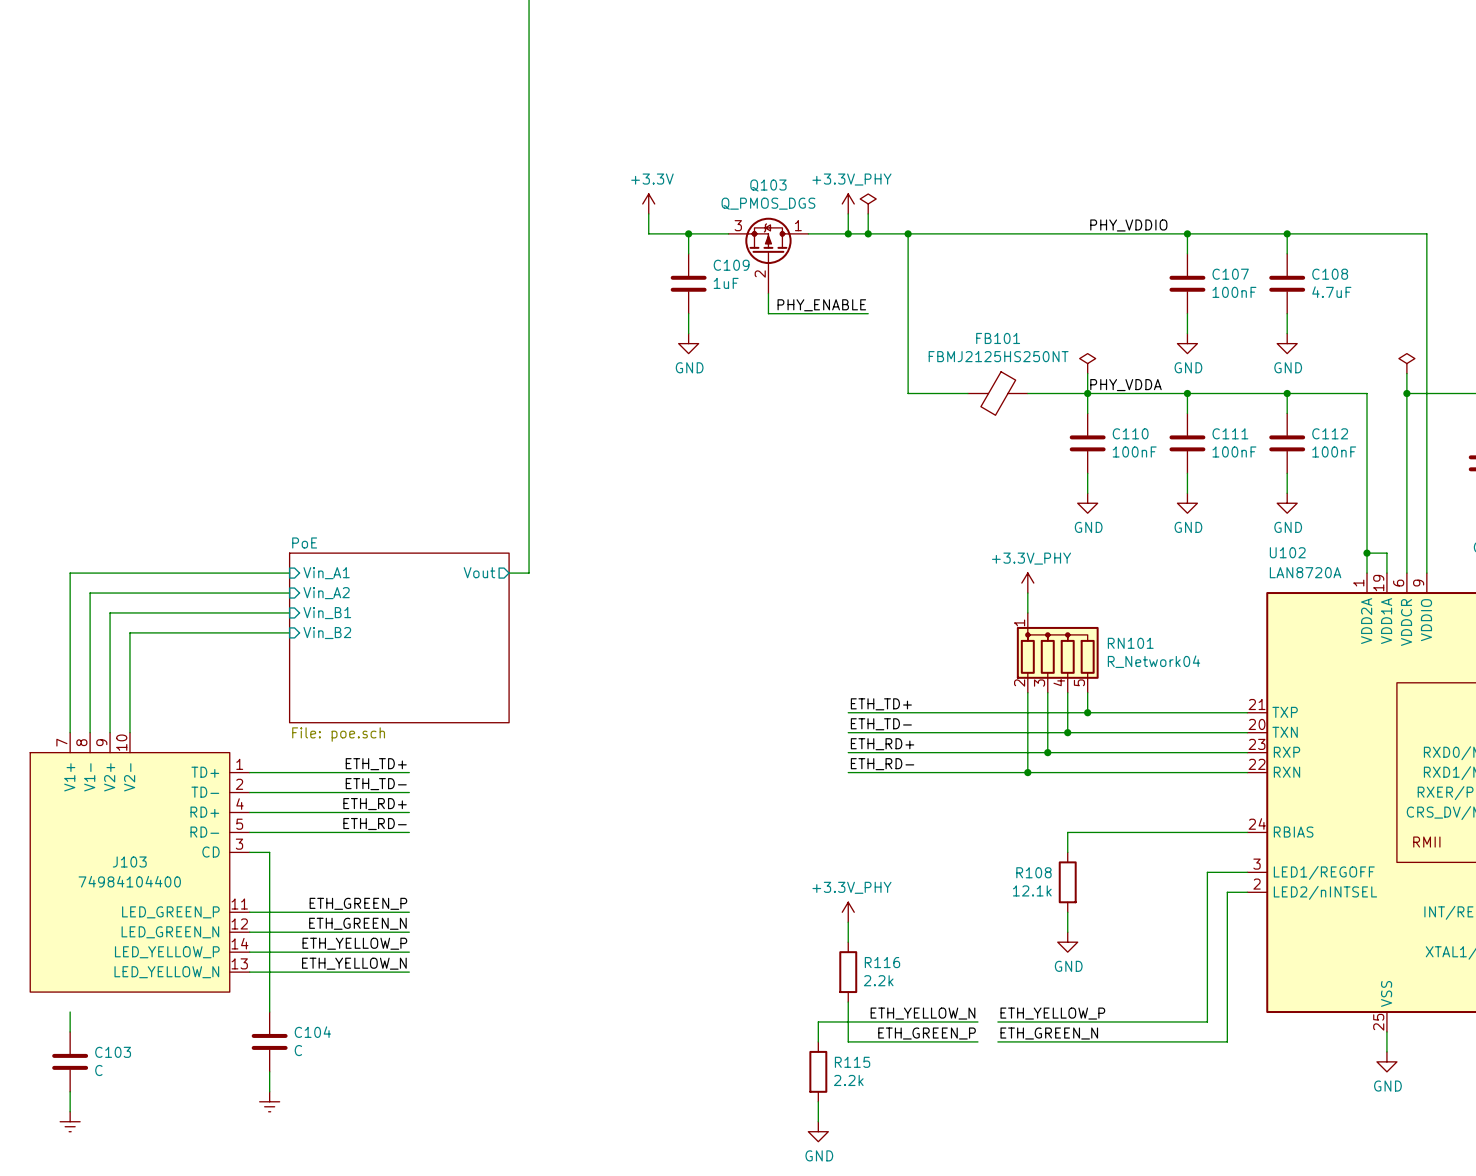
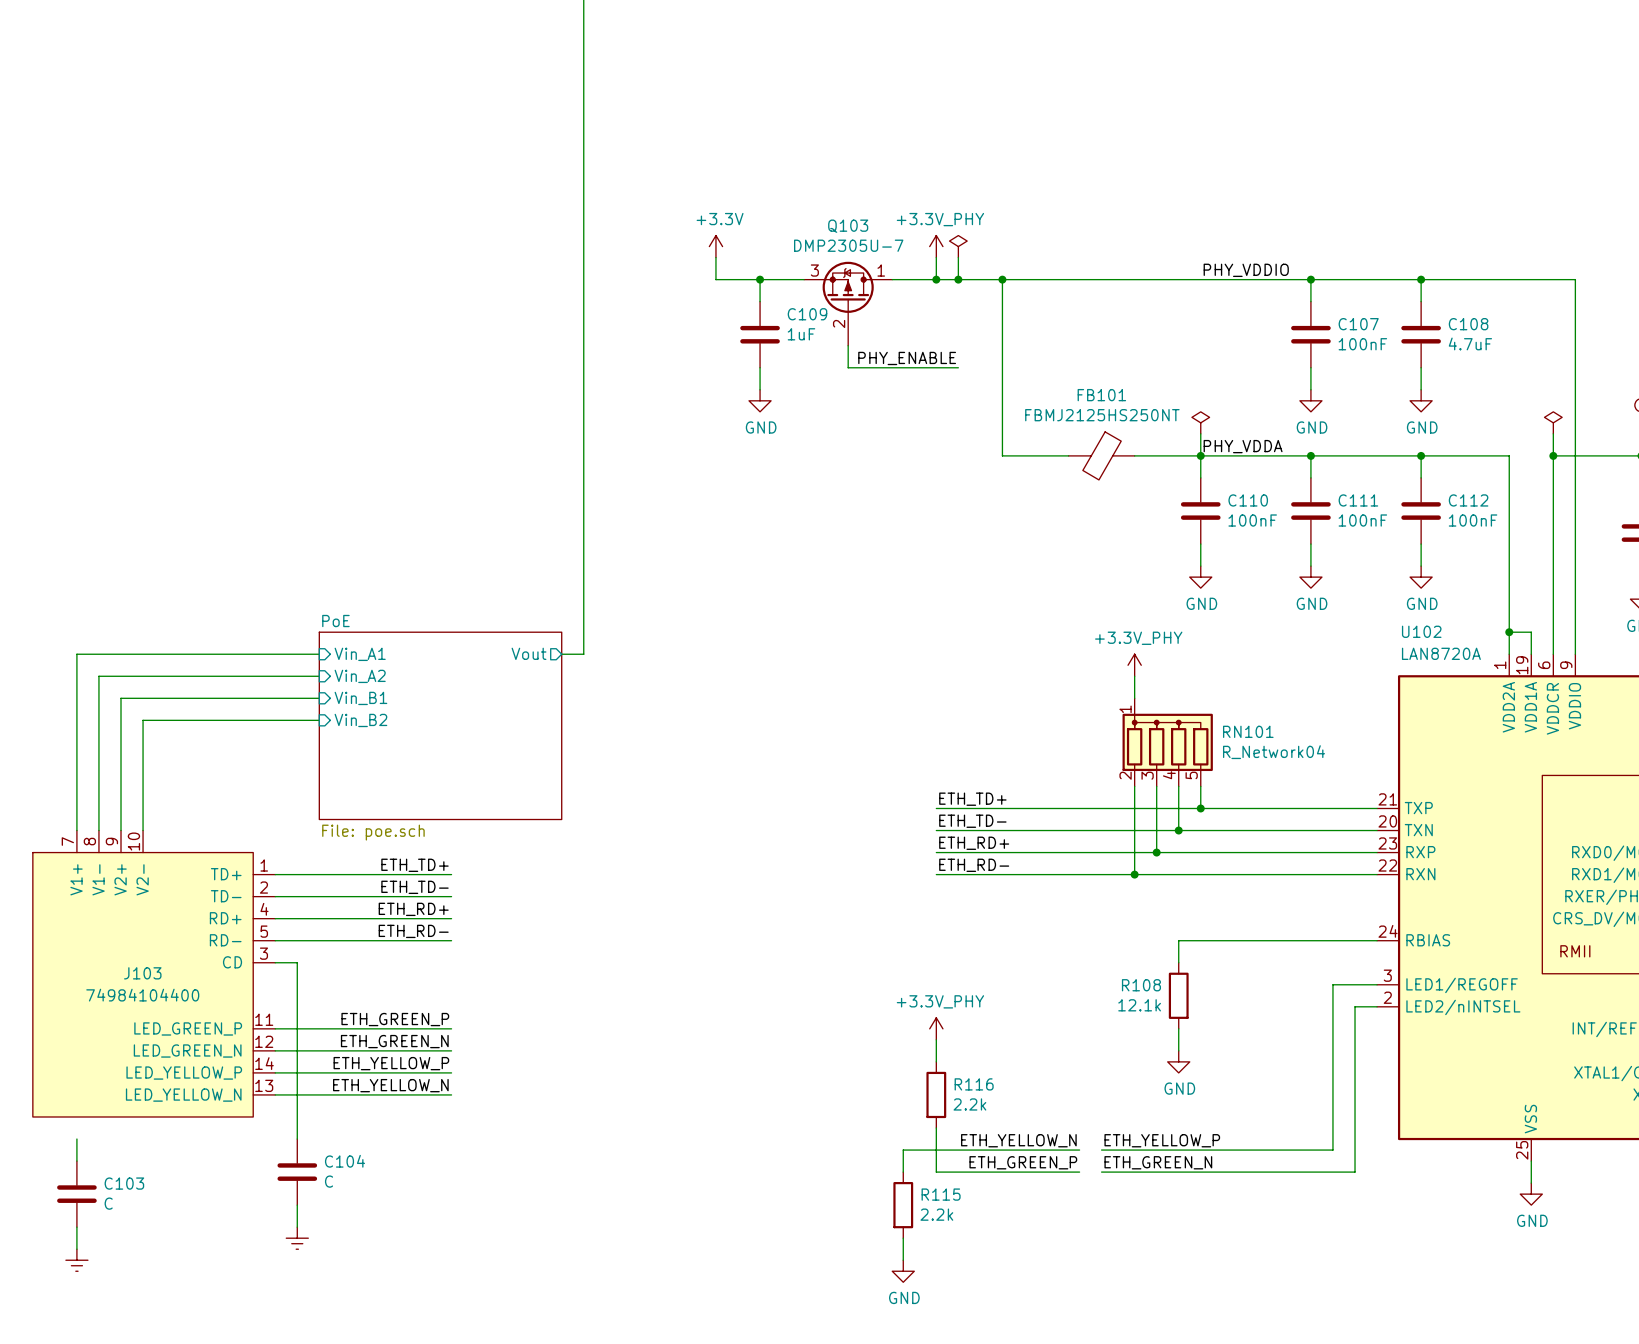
Q103 value: Q_PMOS_DGS (768, 203) -> DMP2305U-7 (848, 245)

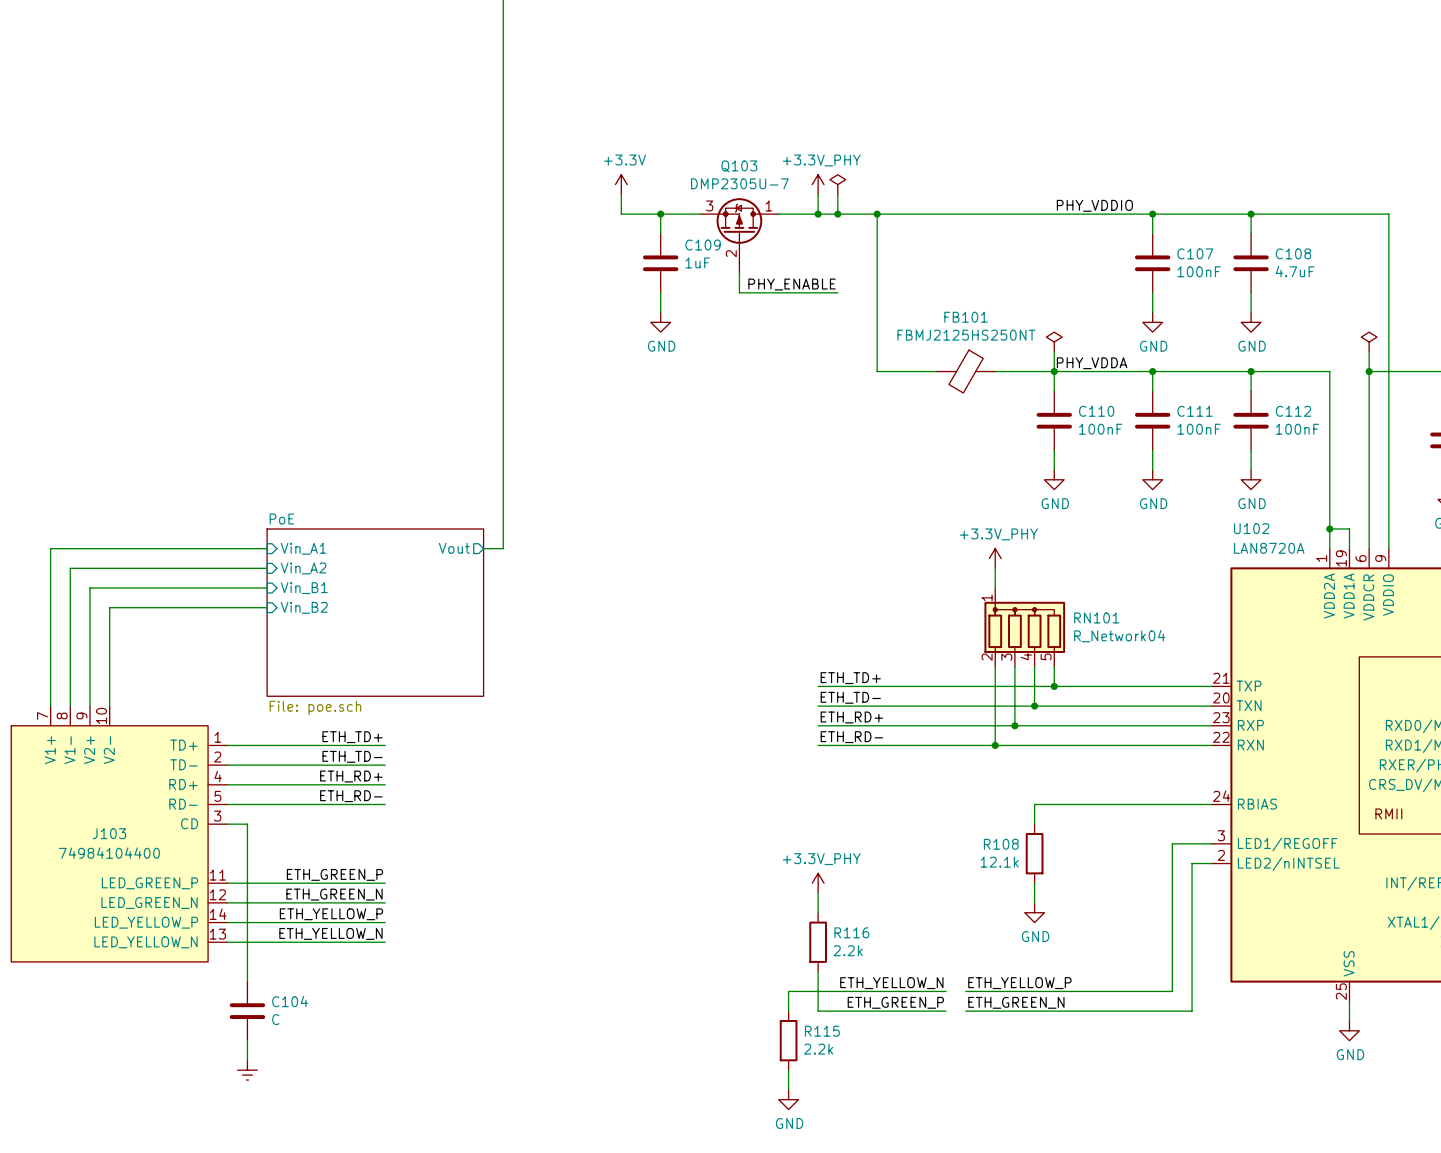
wire: (76, 1139) (76, 1161) -> none
C103: C (76, 1194) -> none
wire: (76, 1227) (76, 1249) -> none
power symbol: (76, 1260) -> none

